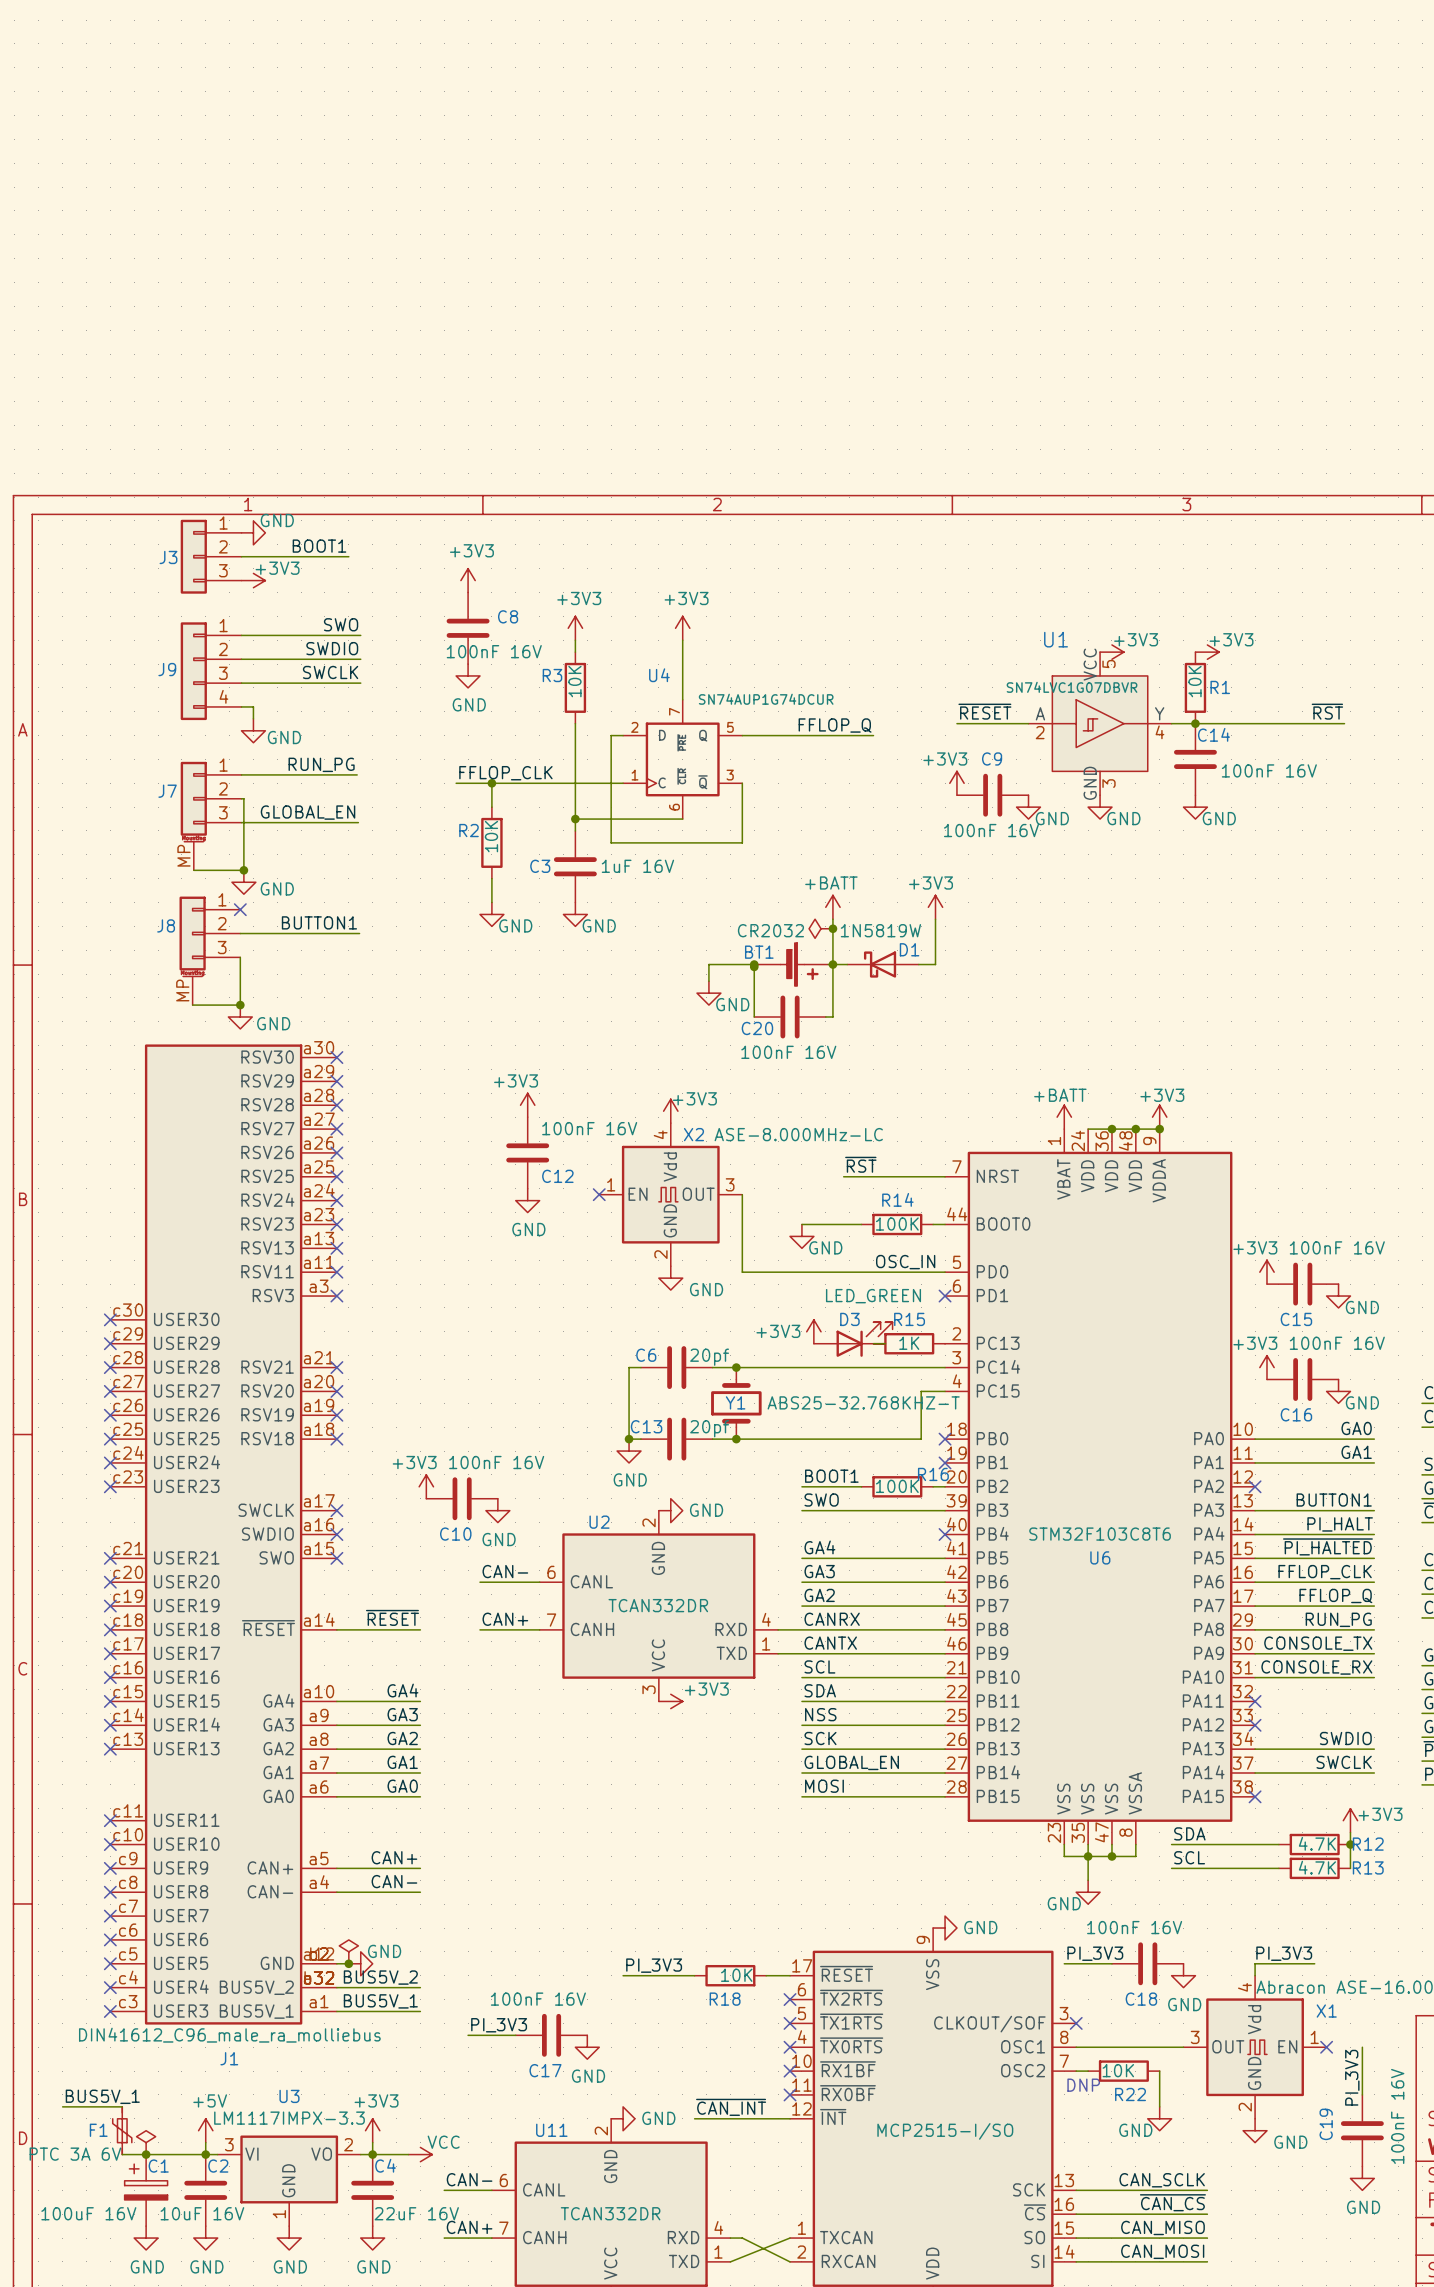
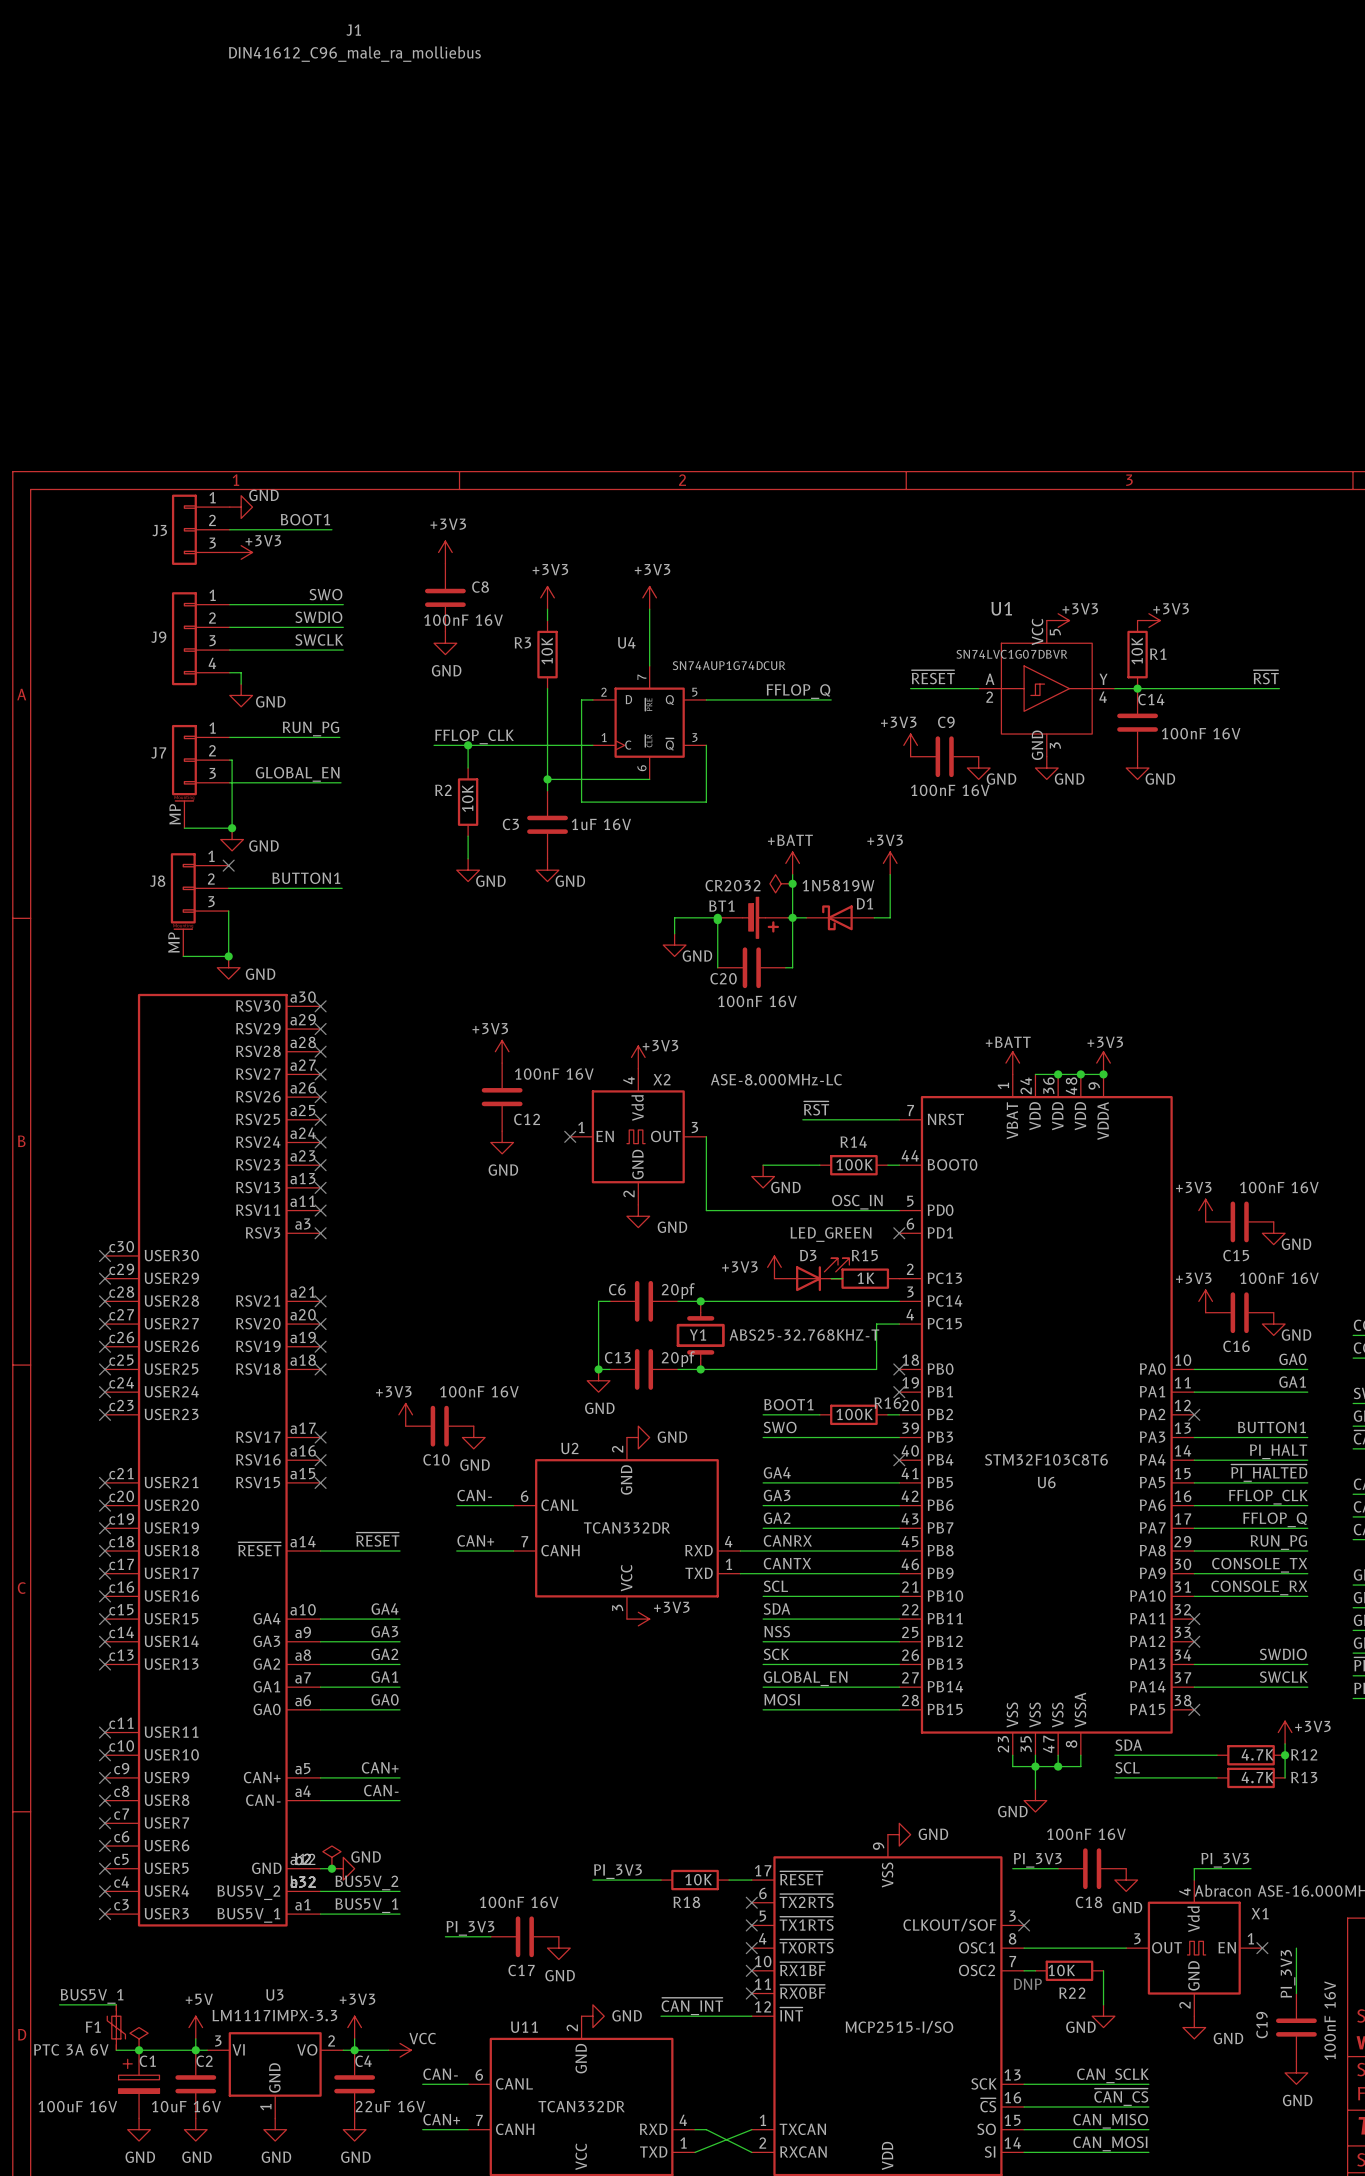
J1 pin name: SWCLK (266, 1510) -> RSV17 (258, 1437)
J1 pin name: SWDIO (267, 1534) -> RSV16 (258, 1459)
J1 pin name: SWO (276, 1557) -> RSV15 (258, 1482)
J1 value position: DIN41612_C96_male_ra_molliebus (229, 2035) -> DIN41612_C96_male_ra_molliebus (354, 54)
J1 name position: J1 (229, 2058) -> J1 (353, 30)

